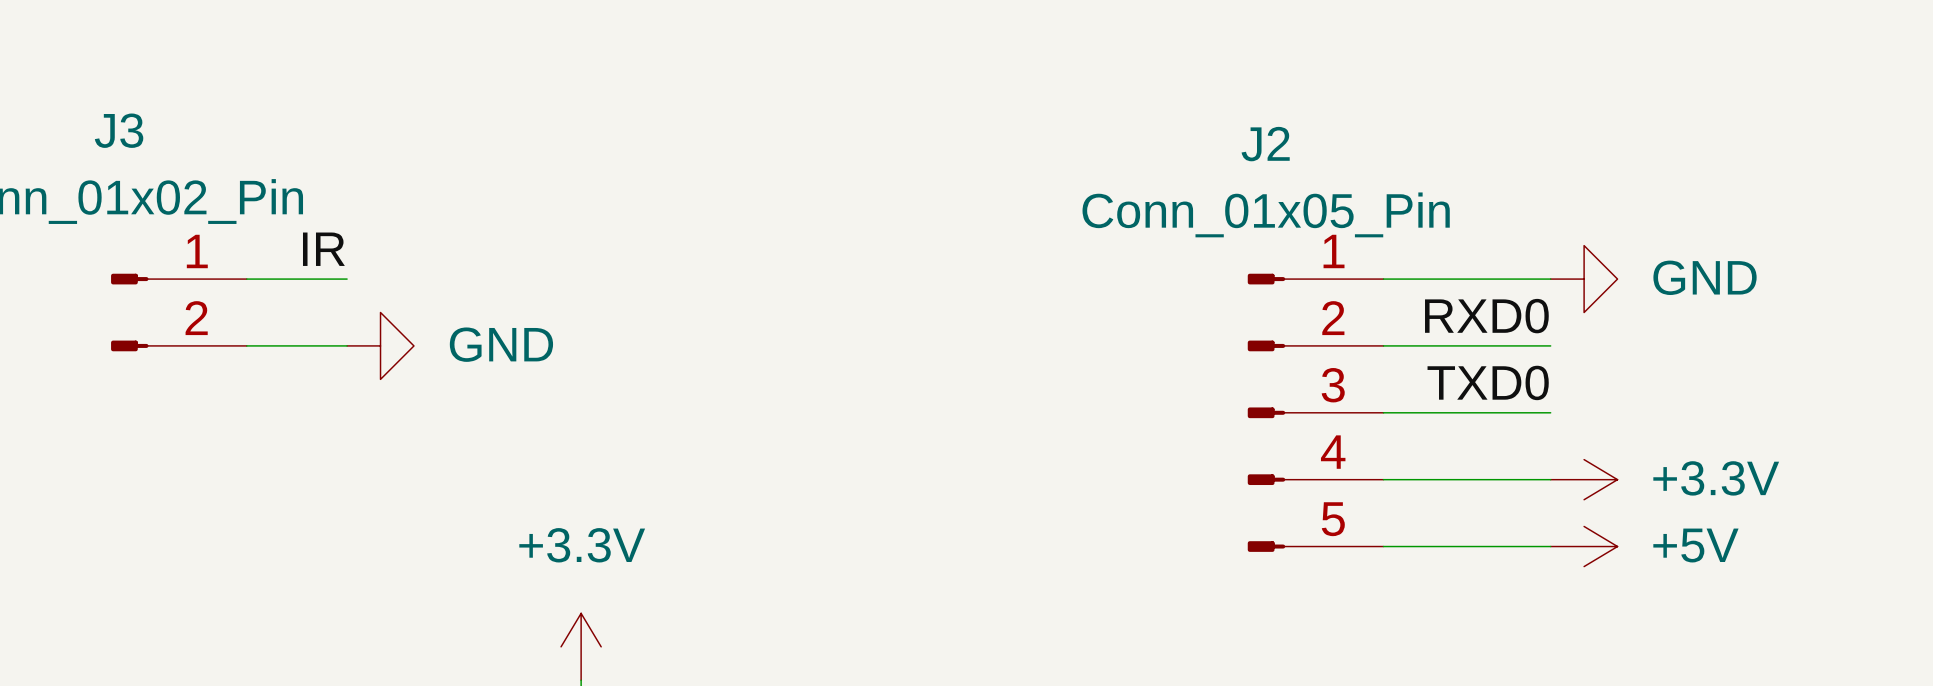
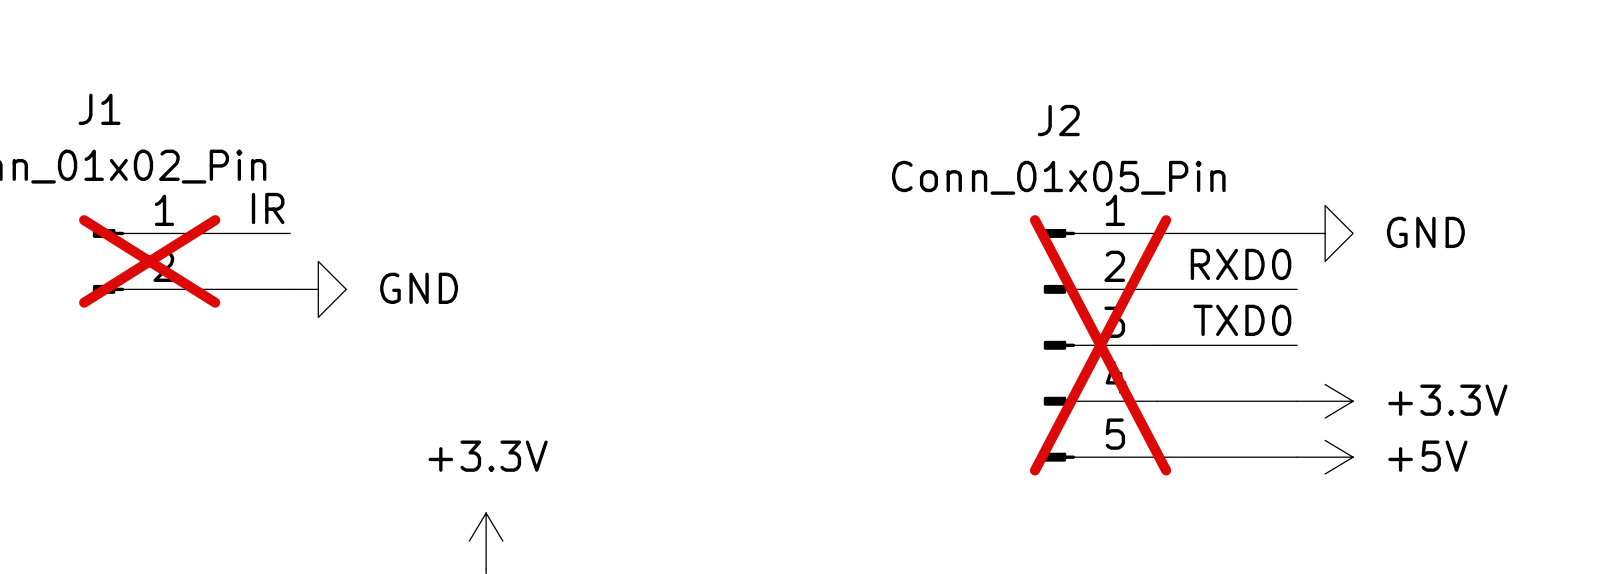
J3 name: J3 (119, 130) -> J1 (99, 109)
J3 do-not-place cross: none -> (149, 261)
J2 do-not-place cross: none -> (1100, 345)

